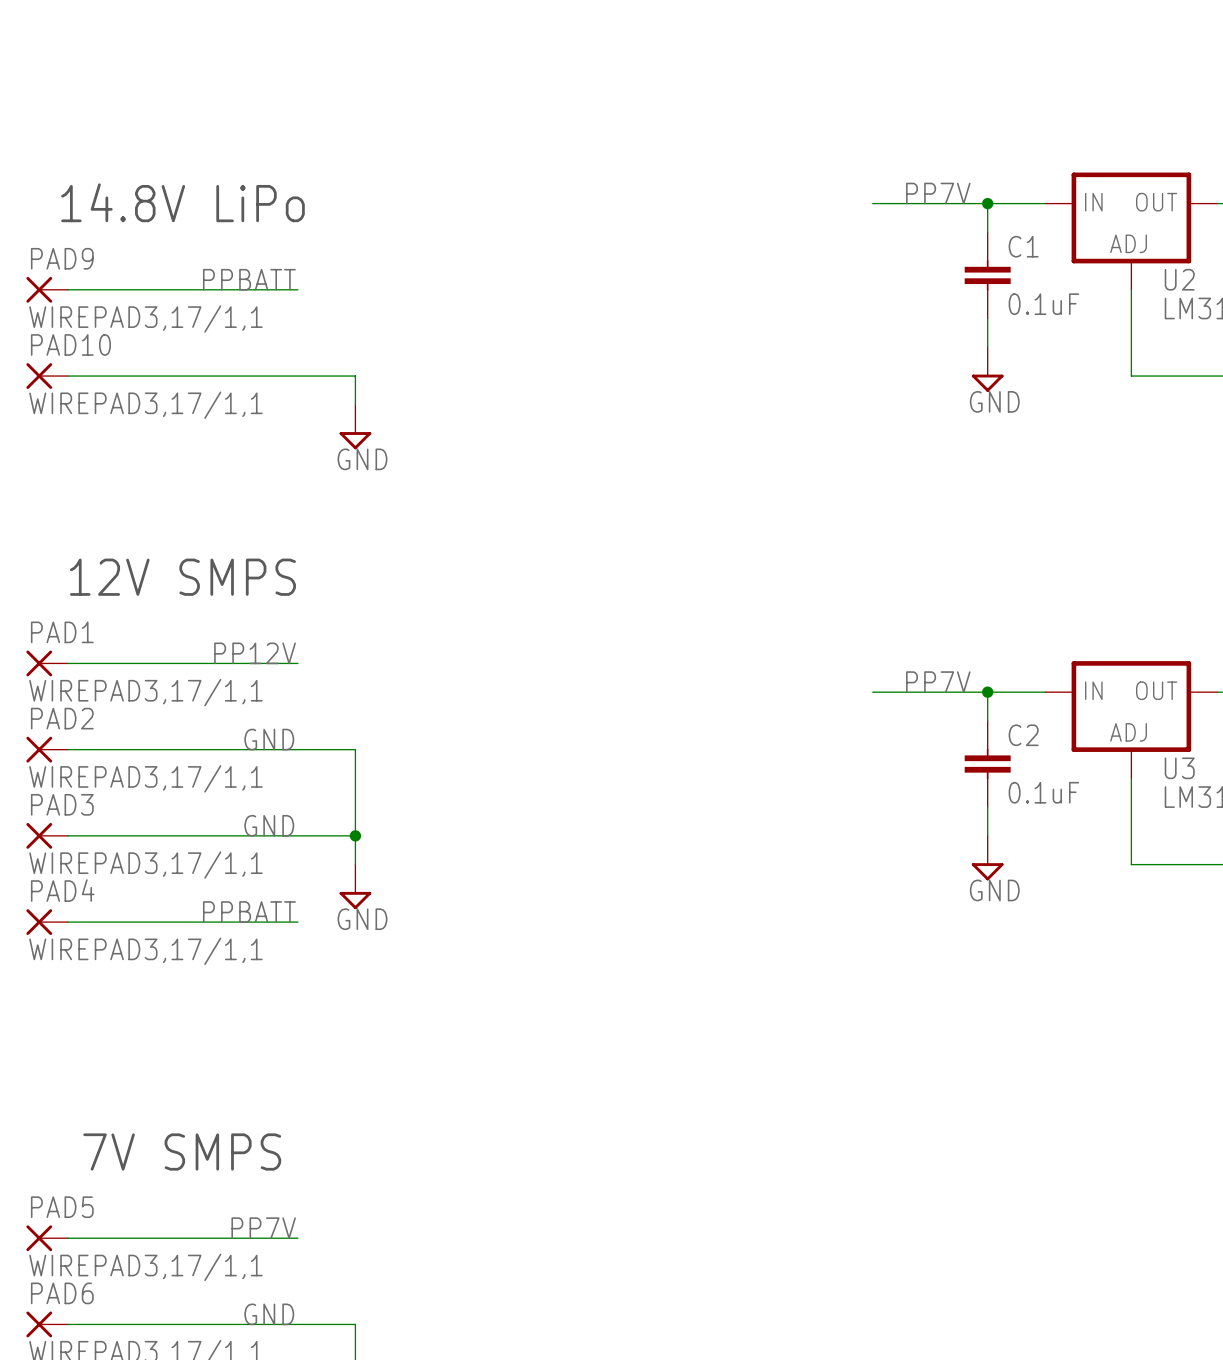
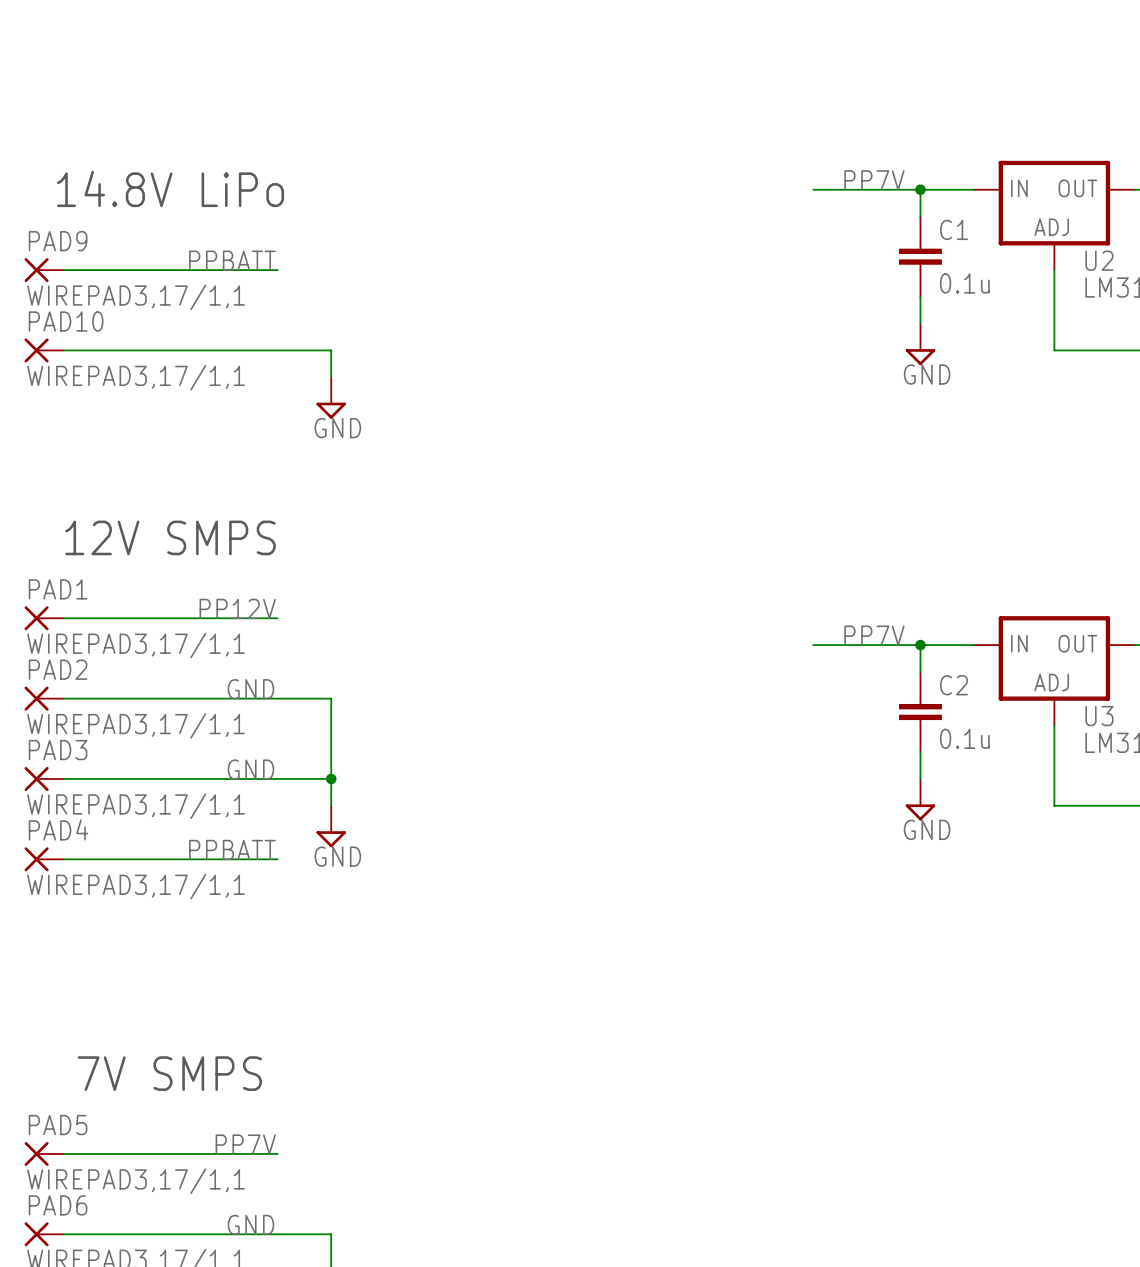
C1 value: 0.1uF (1043, 304) -> 0.1u (964, 283)
C2 value: 0.1uF (1043, 792) -> 0.1u (964, 738)

